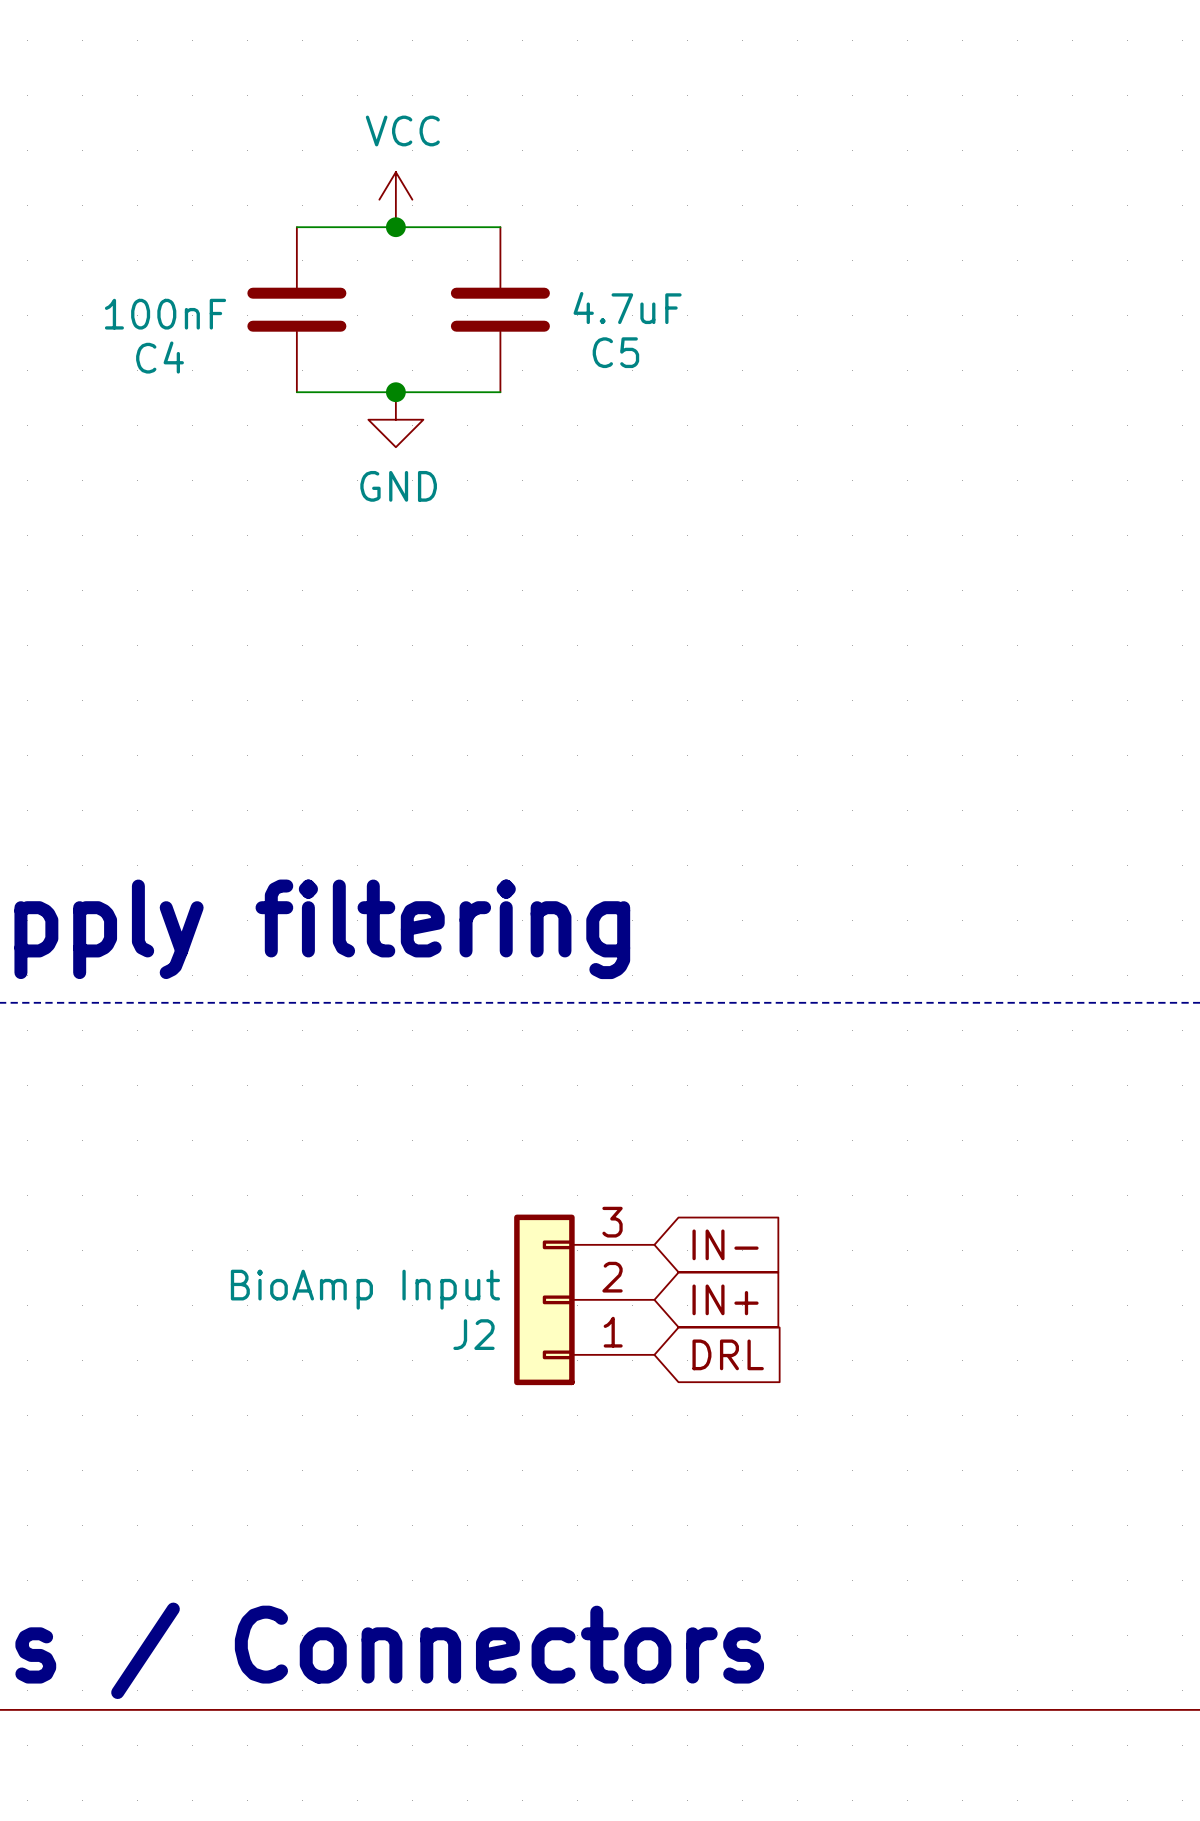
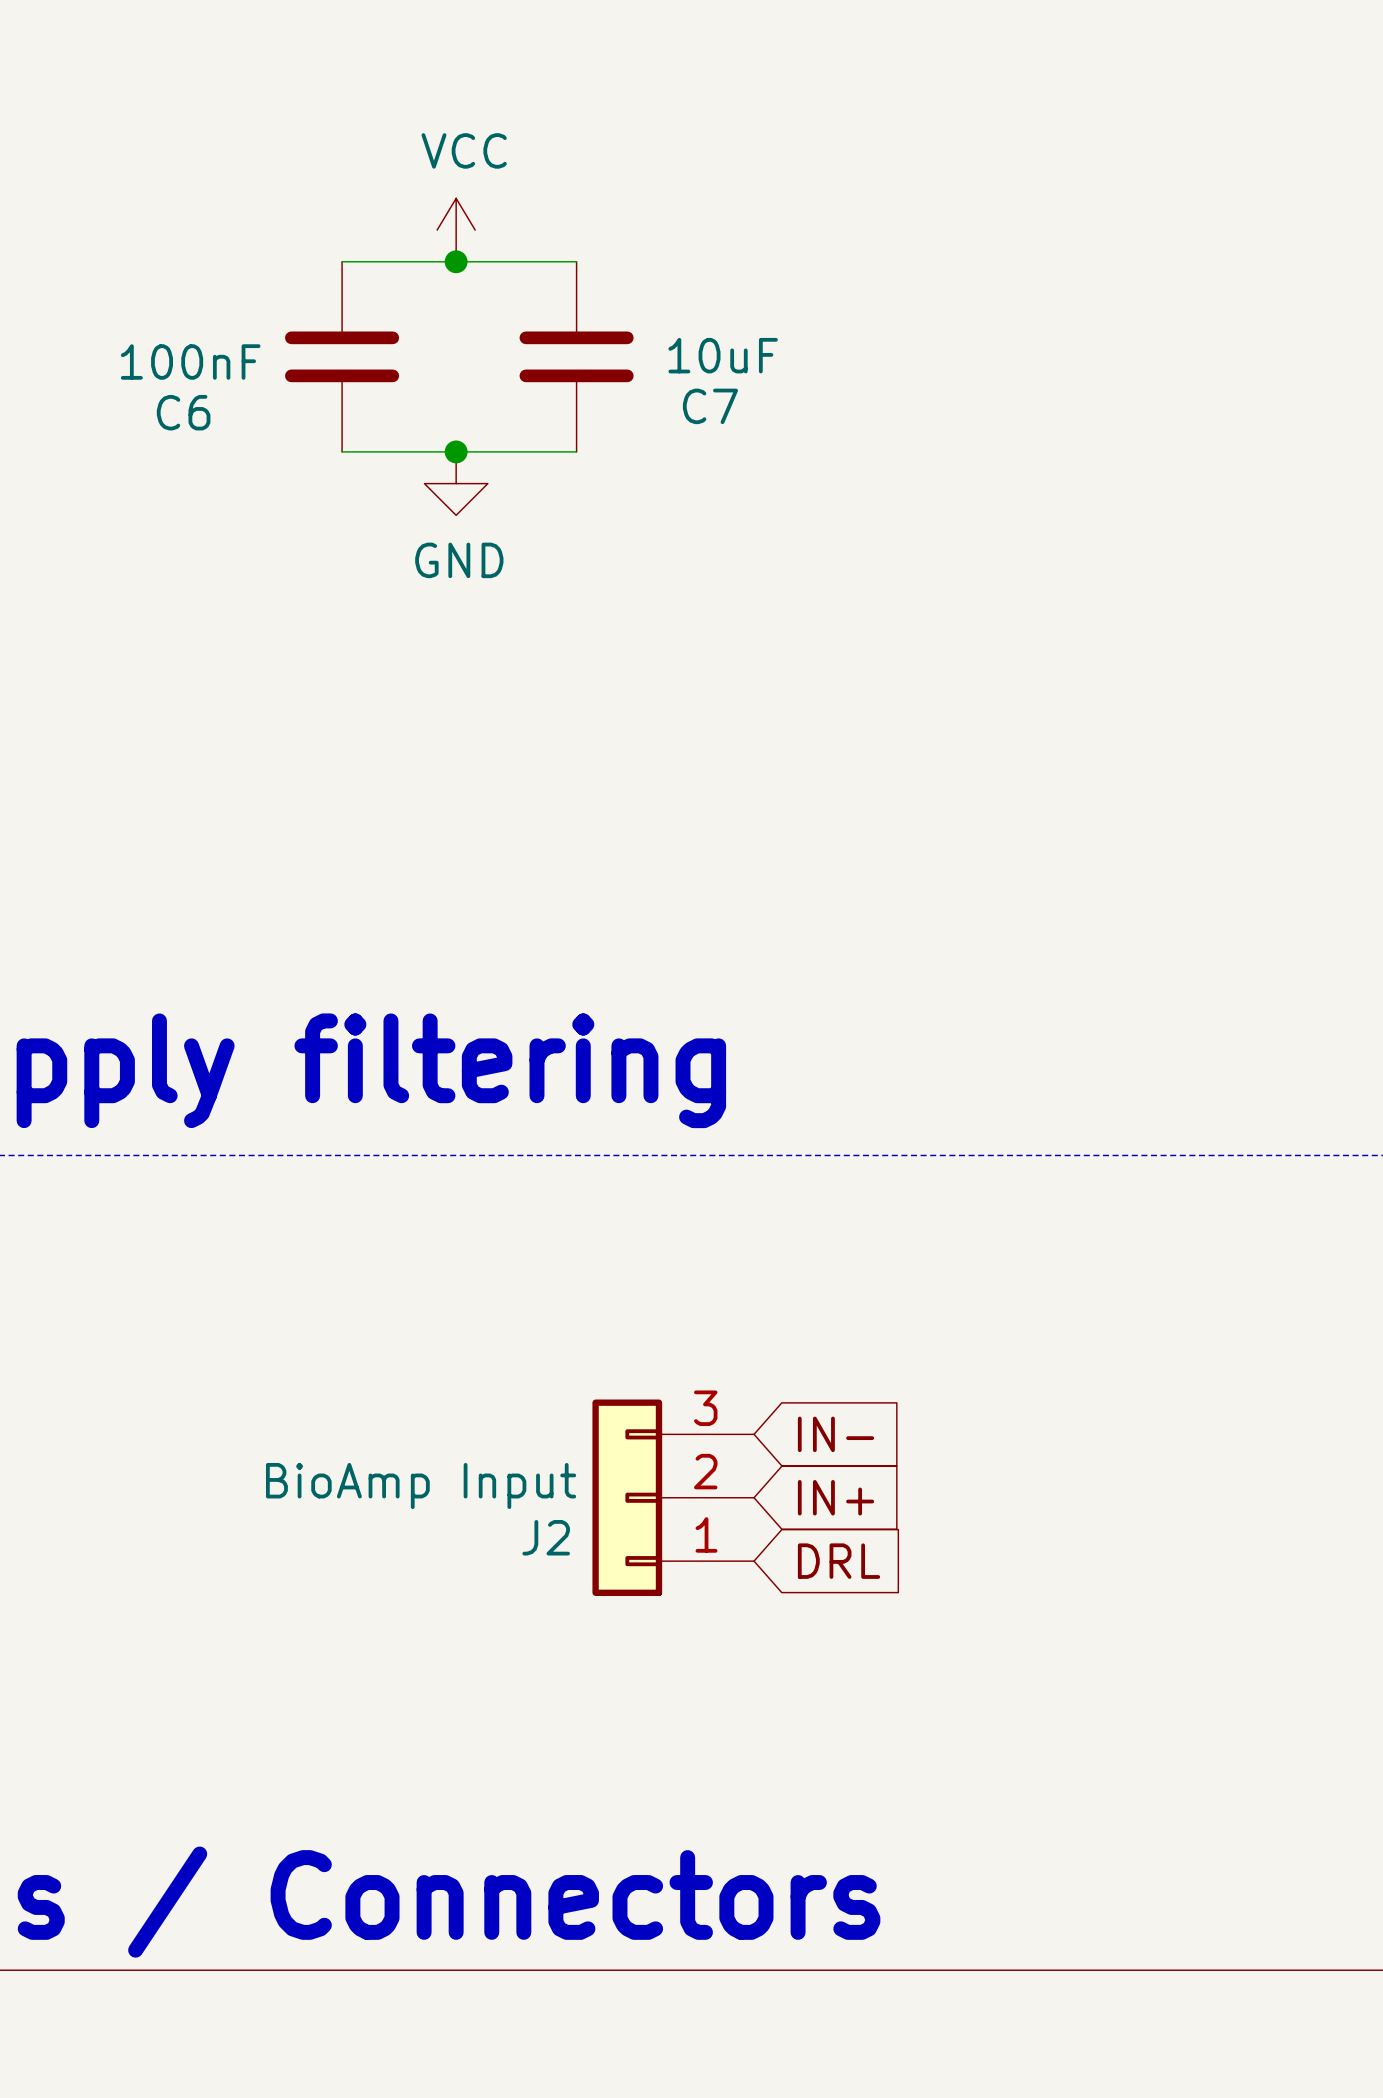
C5 value: 4.7uF (627, 308) -> 10uF (723, 355)
C5 name: C5 (615, 352) -> C7 (710, 406)
C4 name: C4 (160, 357) -> C6 (183, 412)

